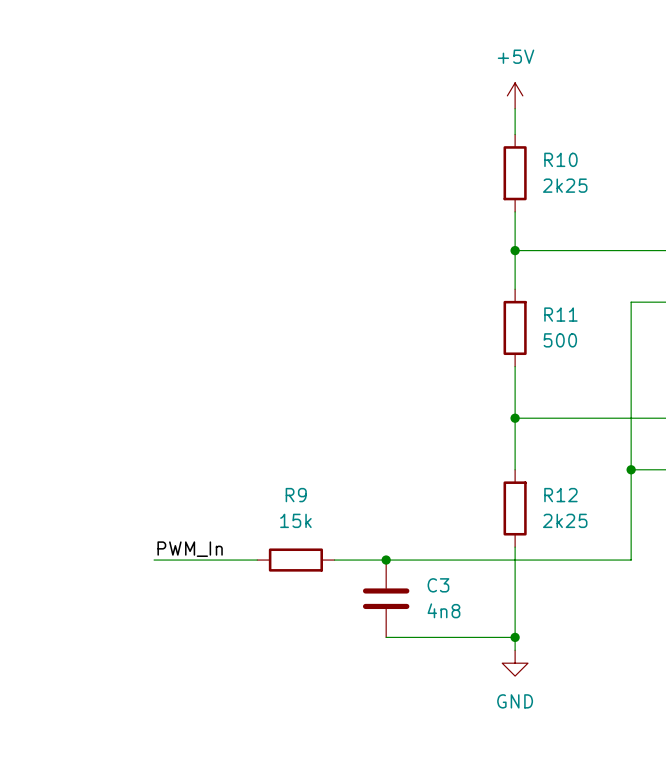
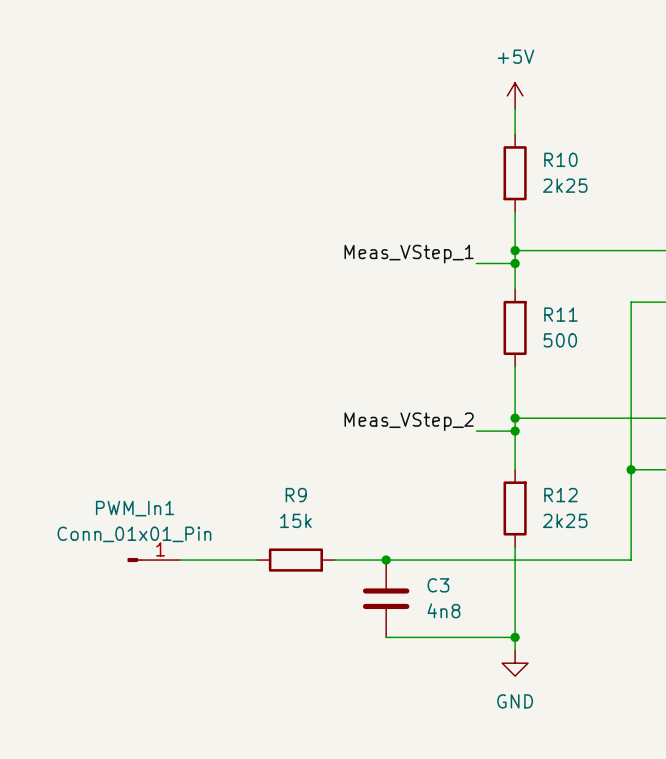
label: none -> Meas_VStep_1 (409, 254)
wire: none -> (476, 263) (515, 263)
junction: none -> (515, 263)
label: none -> Meas_VStep_2 (409, 421)
wire: none -> (476, 431) (515, 431)
junction: none -> (515, 431)
label: PWM_In (190, 549) -> none
PWM_In1: none -> Conn_01x01_Pin (153, 560)

